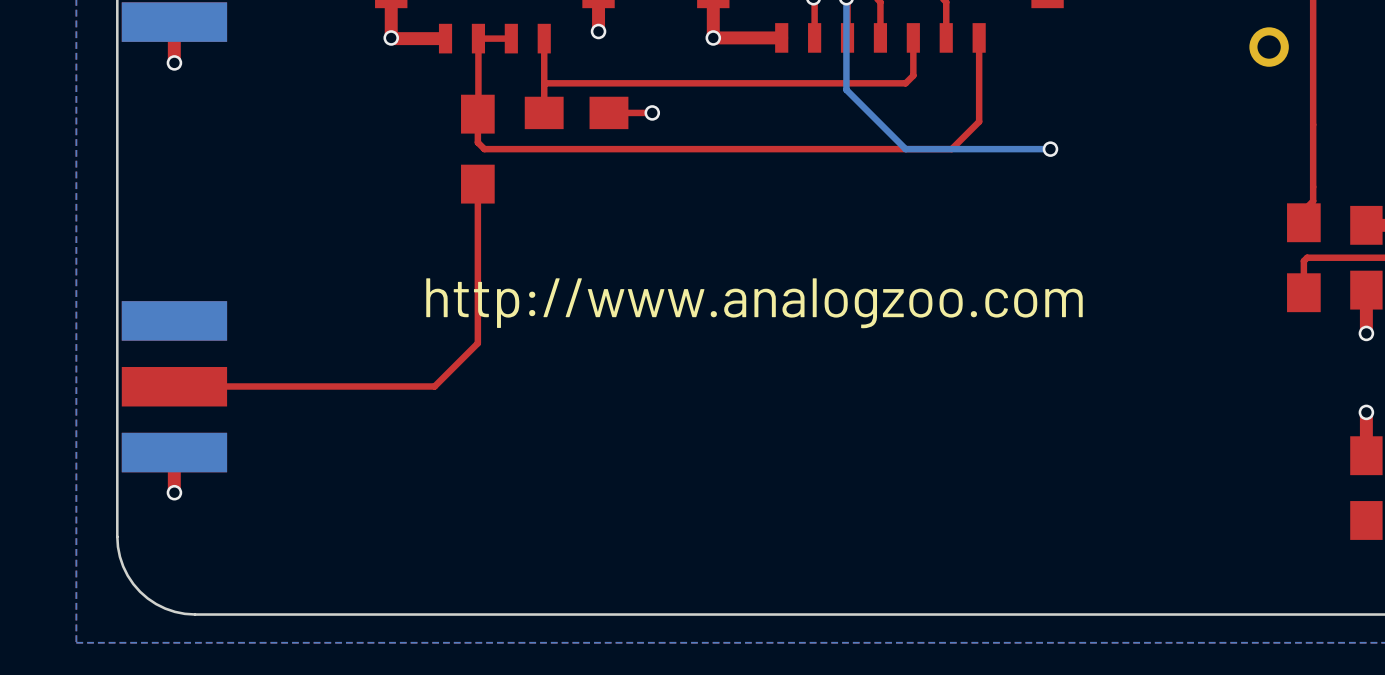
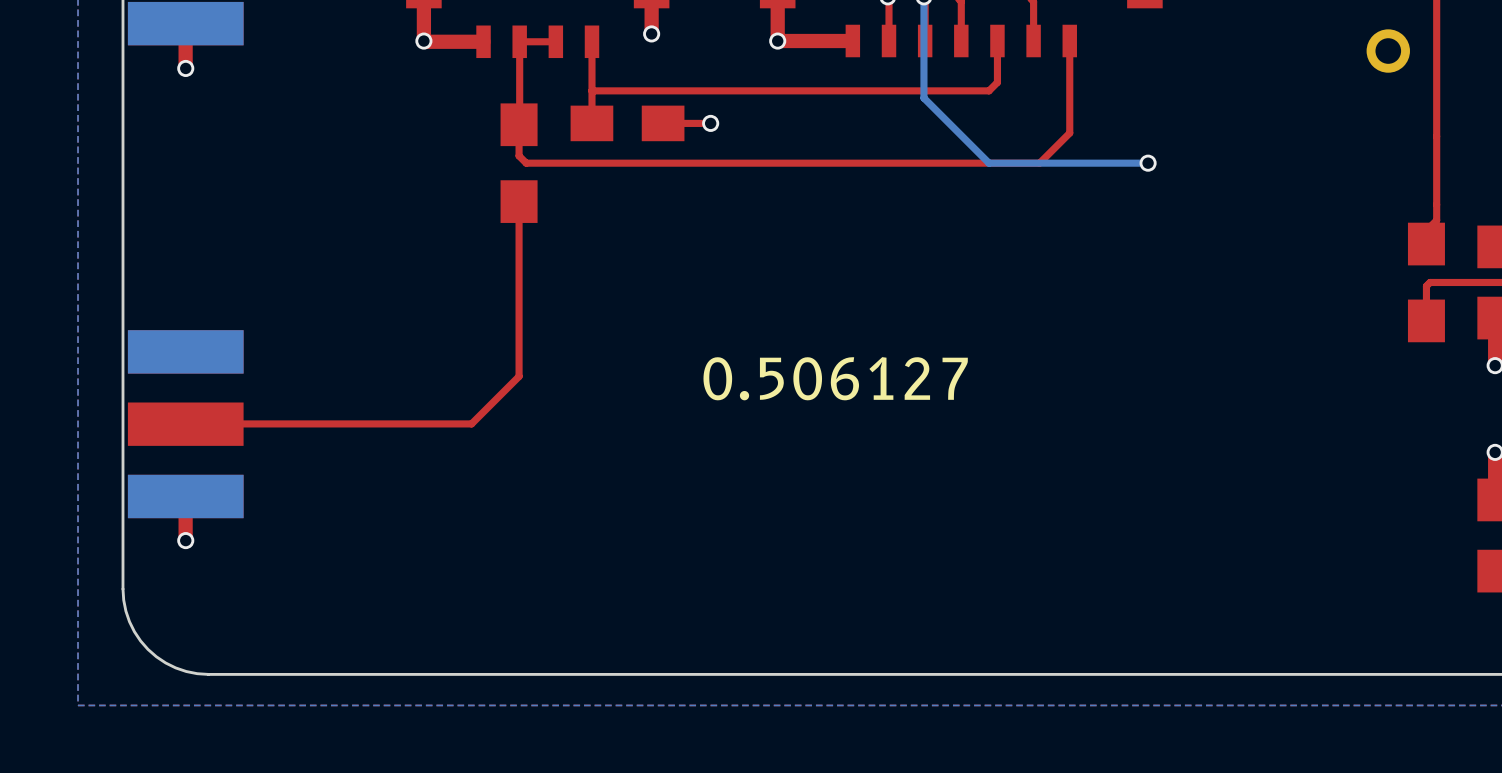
text: http://www.analogzoo.com (754, 303) -> none
text: none -> 0.506127 (835, 378)

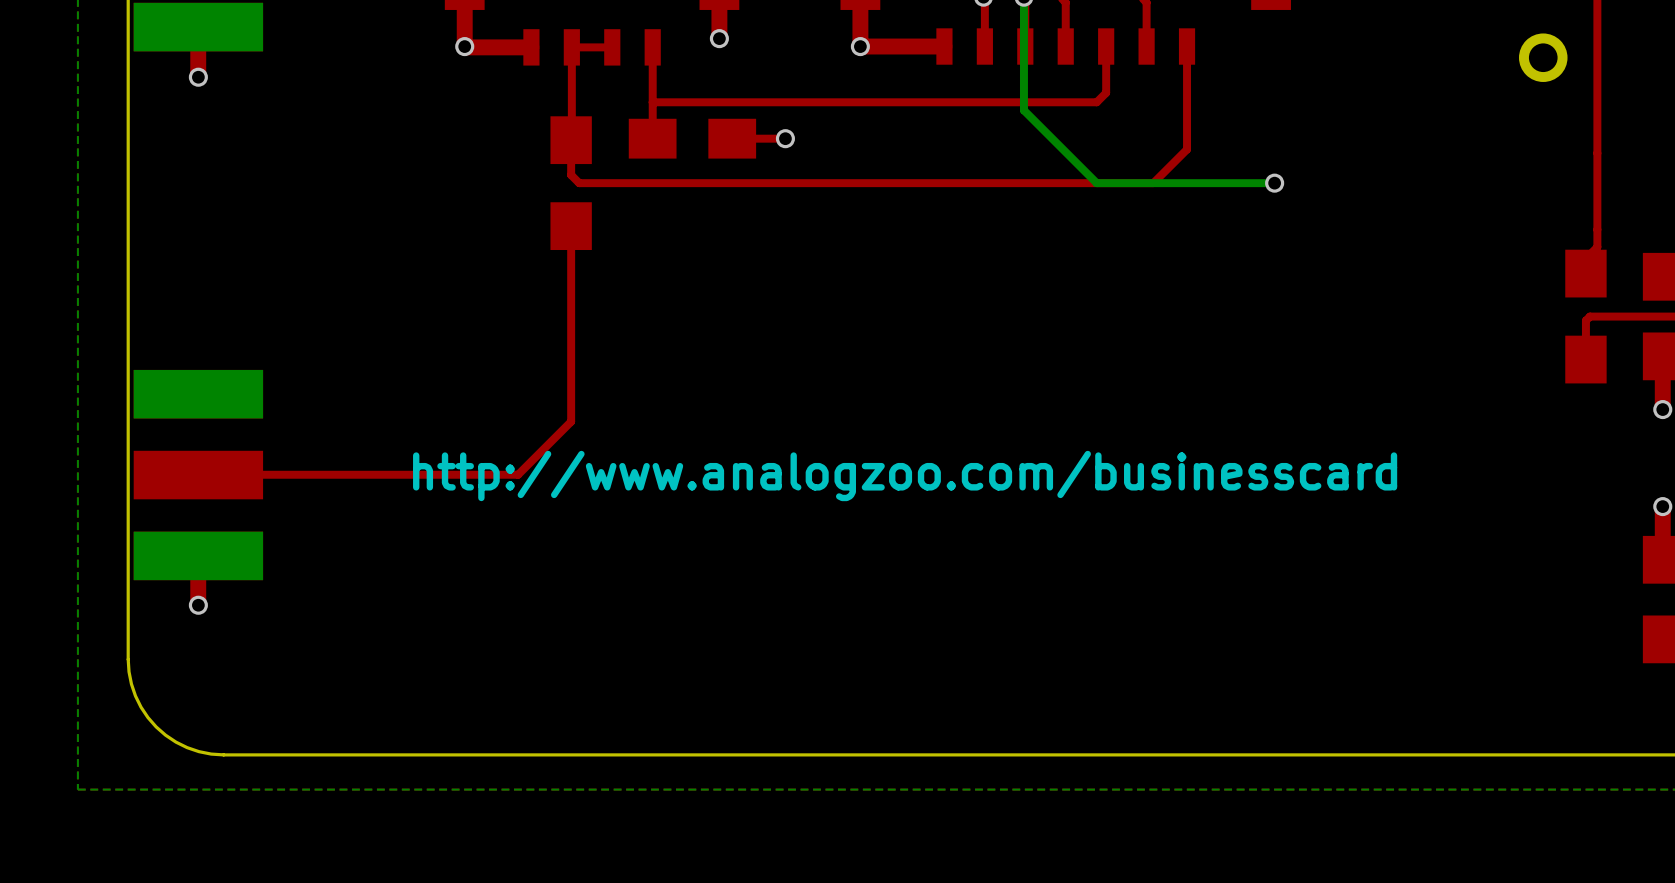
text: 0.506127 (835, 378) -> none
text: none -> http://www.analogzoo.com/businesscard (905, 475)

